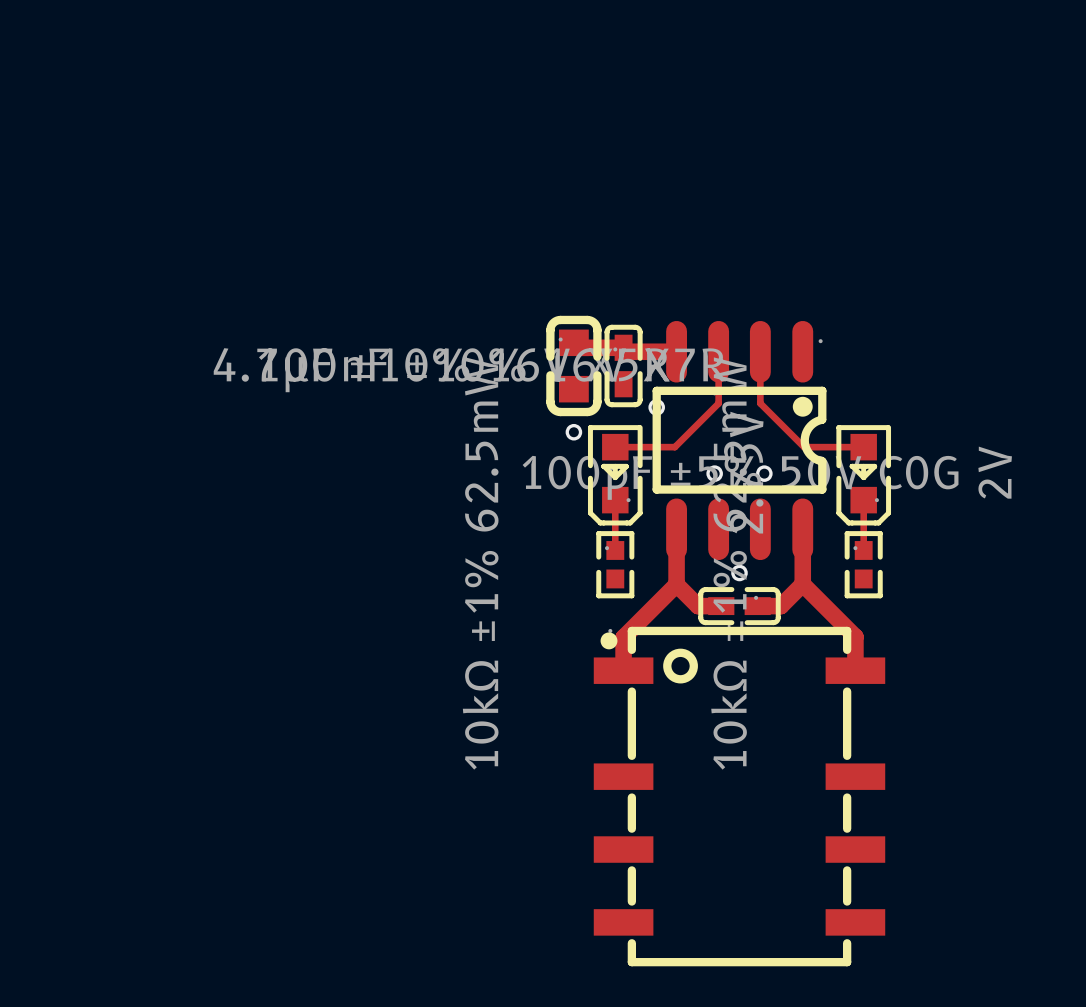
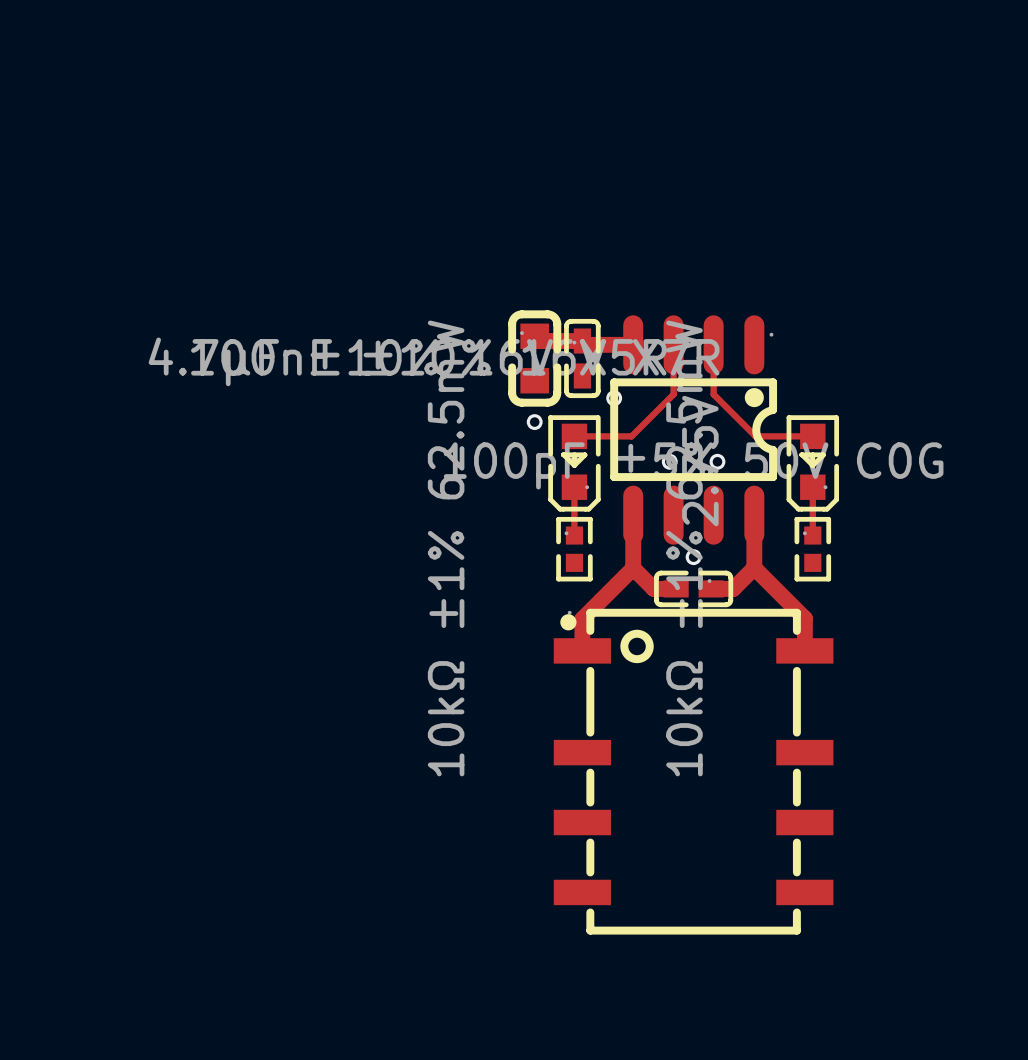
part value: 2V (995, 472) -> none

